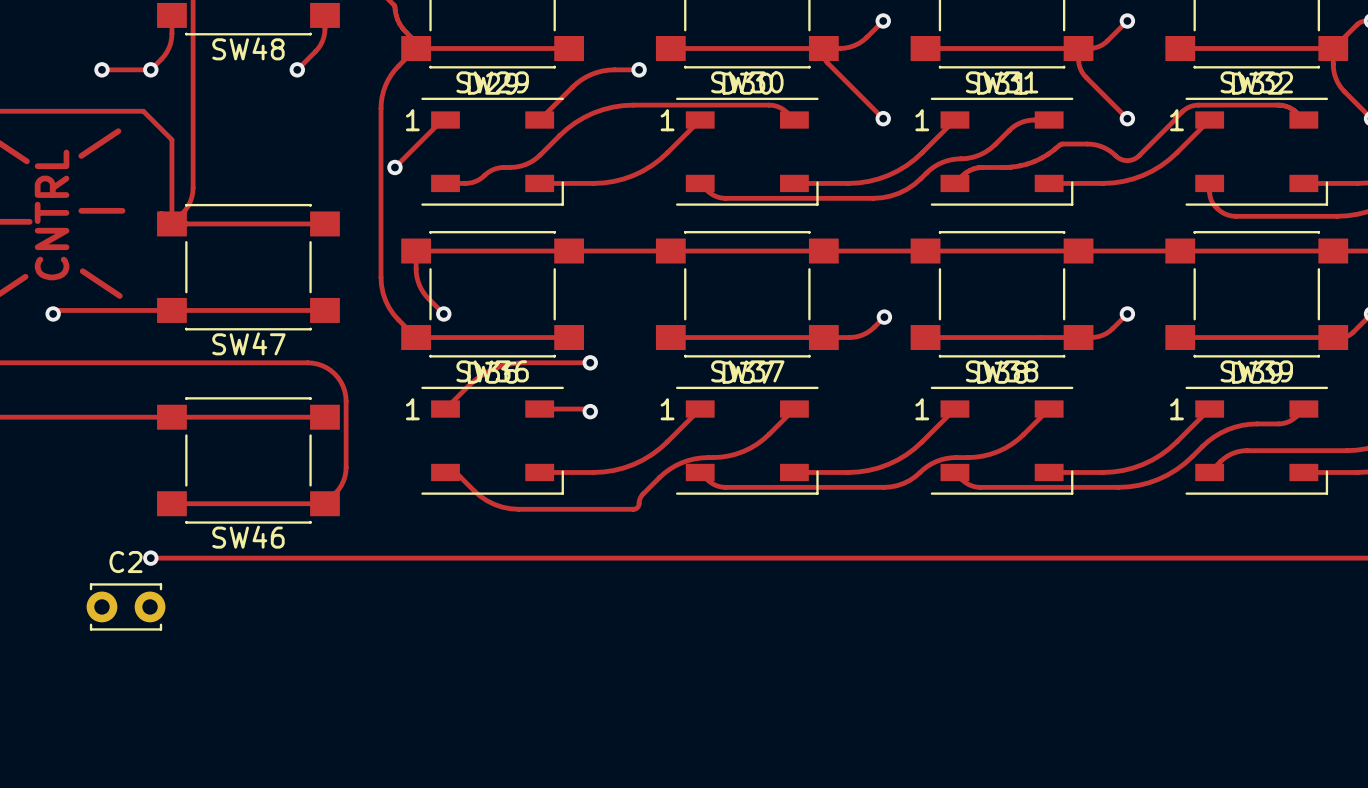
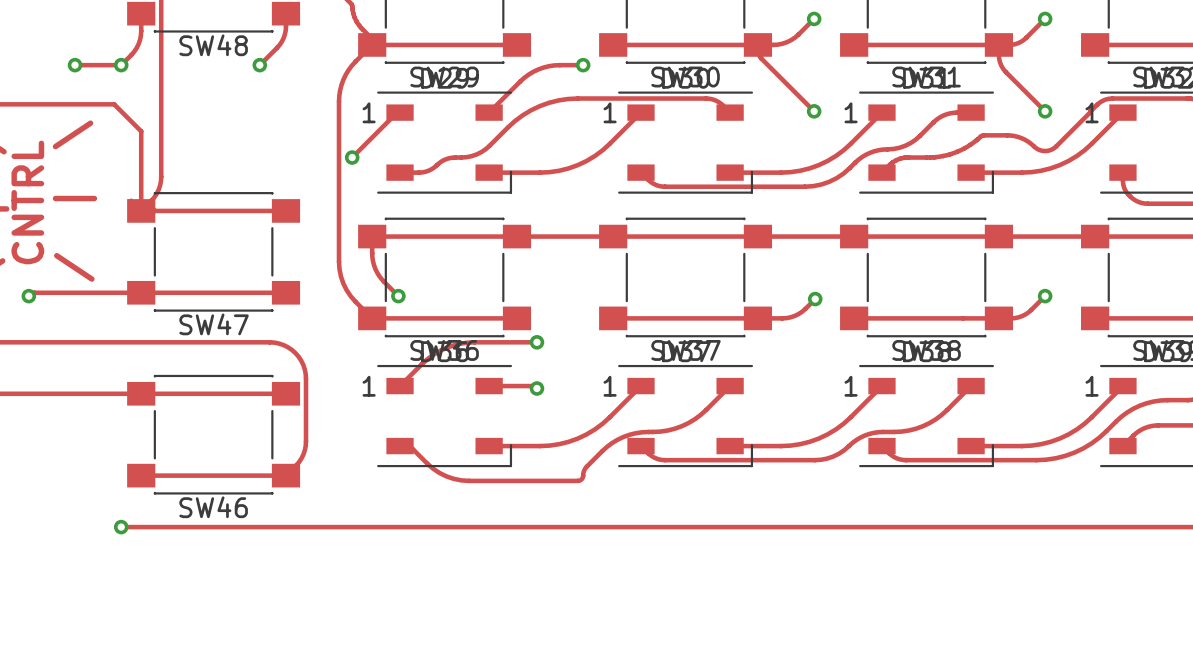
C2: (126, 606) -> none

